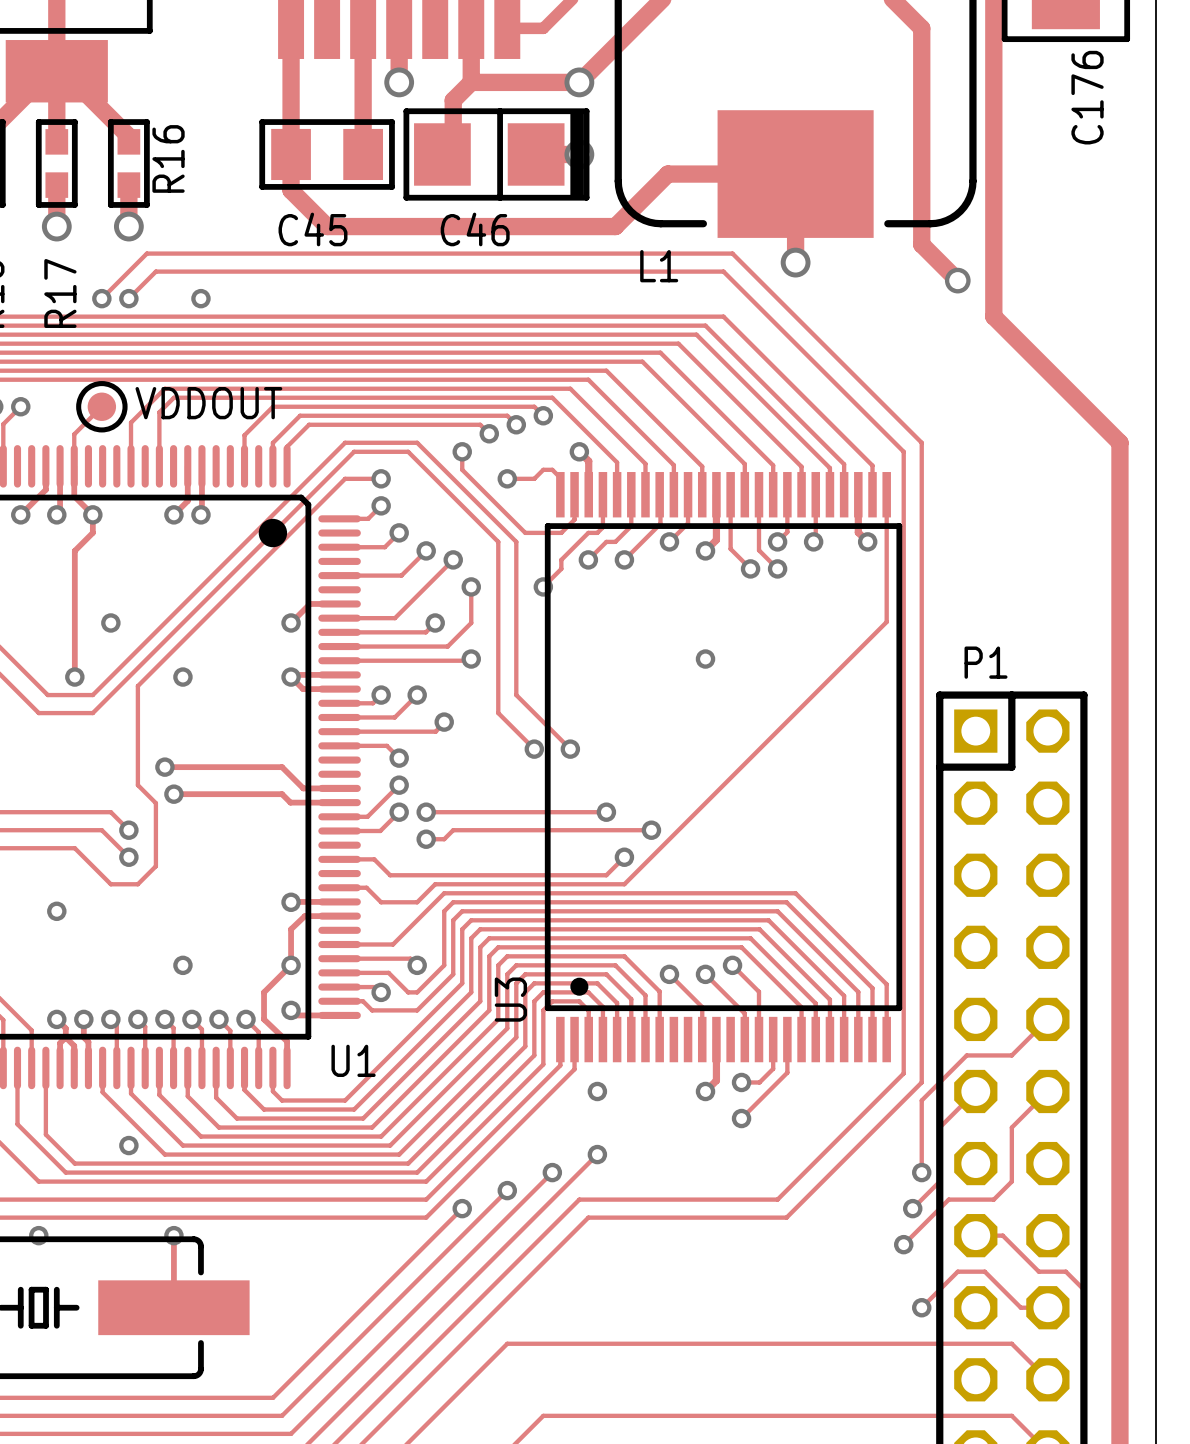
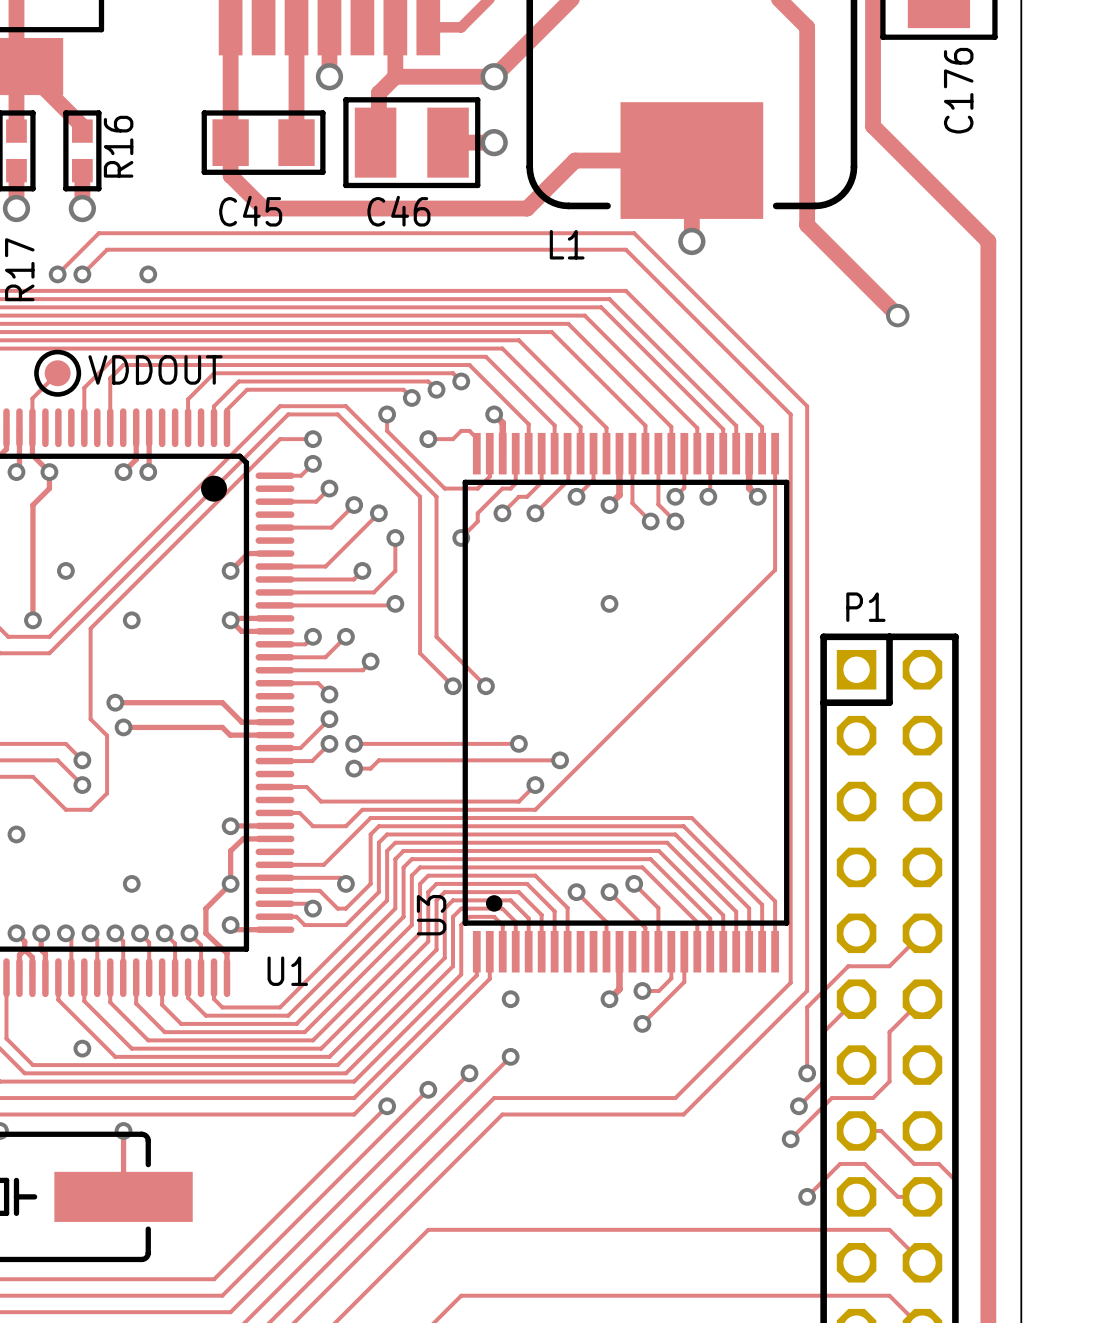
C46 footprint: [403, 108, 590, 201] -> [343, 97, 481, 189]
track: (993, 136) (993, 316) -> (840, 257) (873, 290)
via position: (957, 280) -> (897, 315)
track: (1020, 343) (1119, 442) -> (873, 126) (988, 241) (988, 406)

